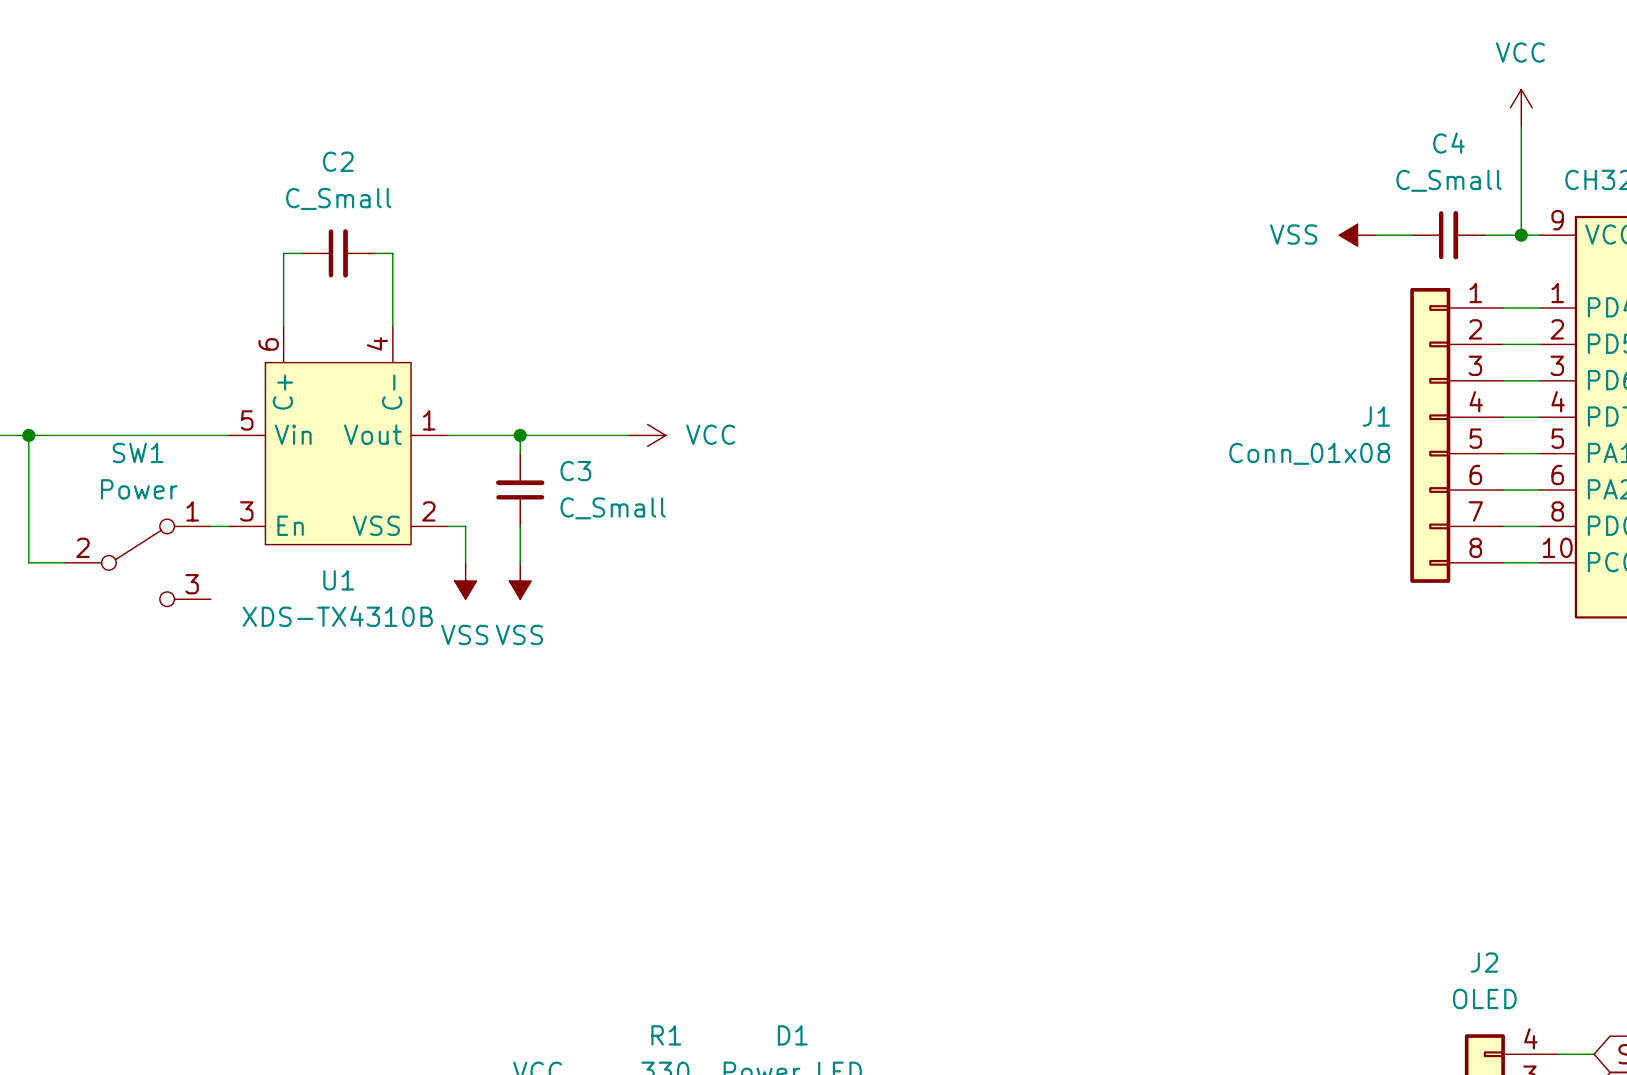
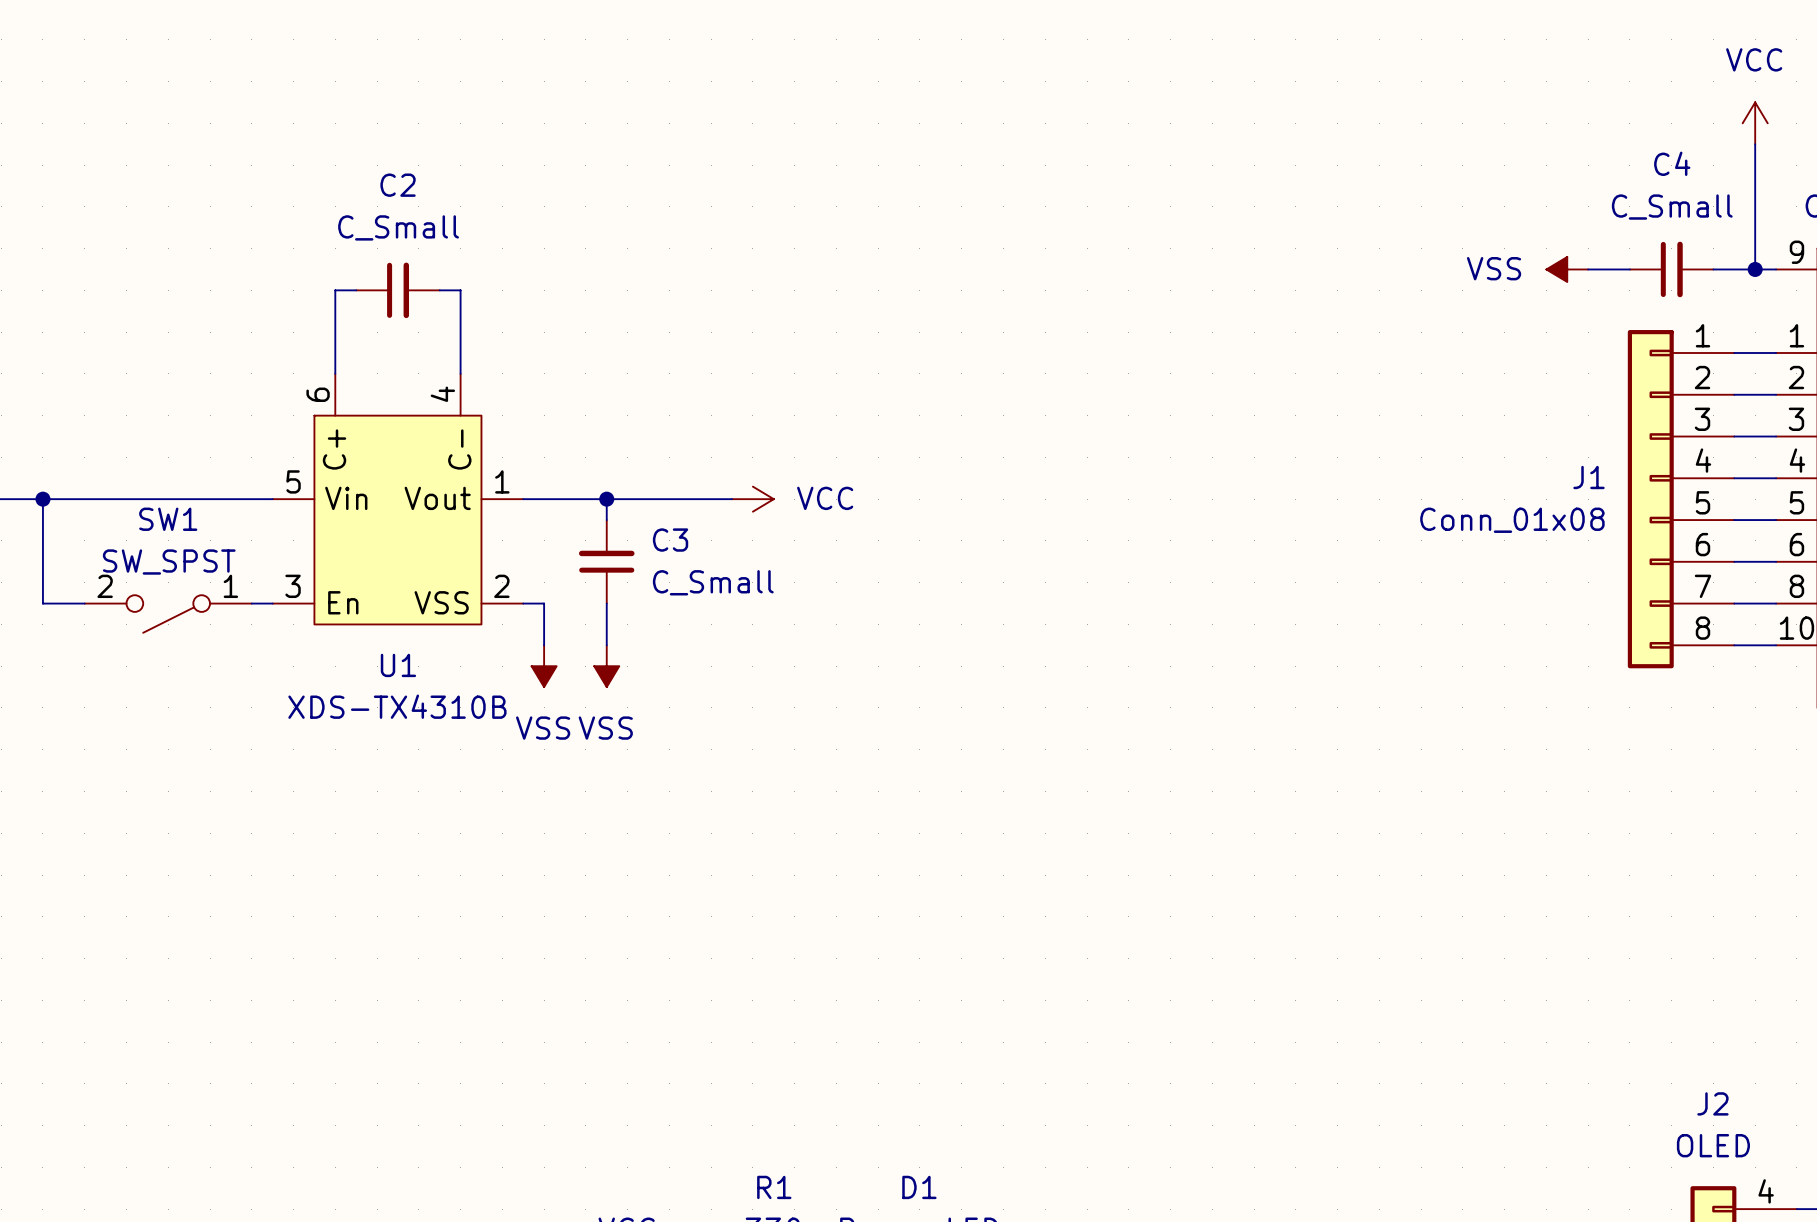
SW1 value: Power (139, 489) -> SW_SPST (169, 562)
SW1 symbol: [65, 519, 211, 607] -> [84, 595, 252, 633]
wire: (28, 526) (28, 562) (65, 562) -> (42, 603) (84, 603)

